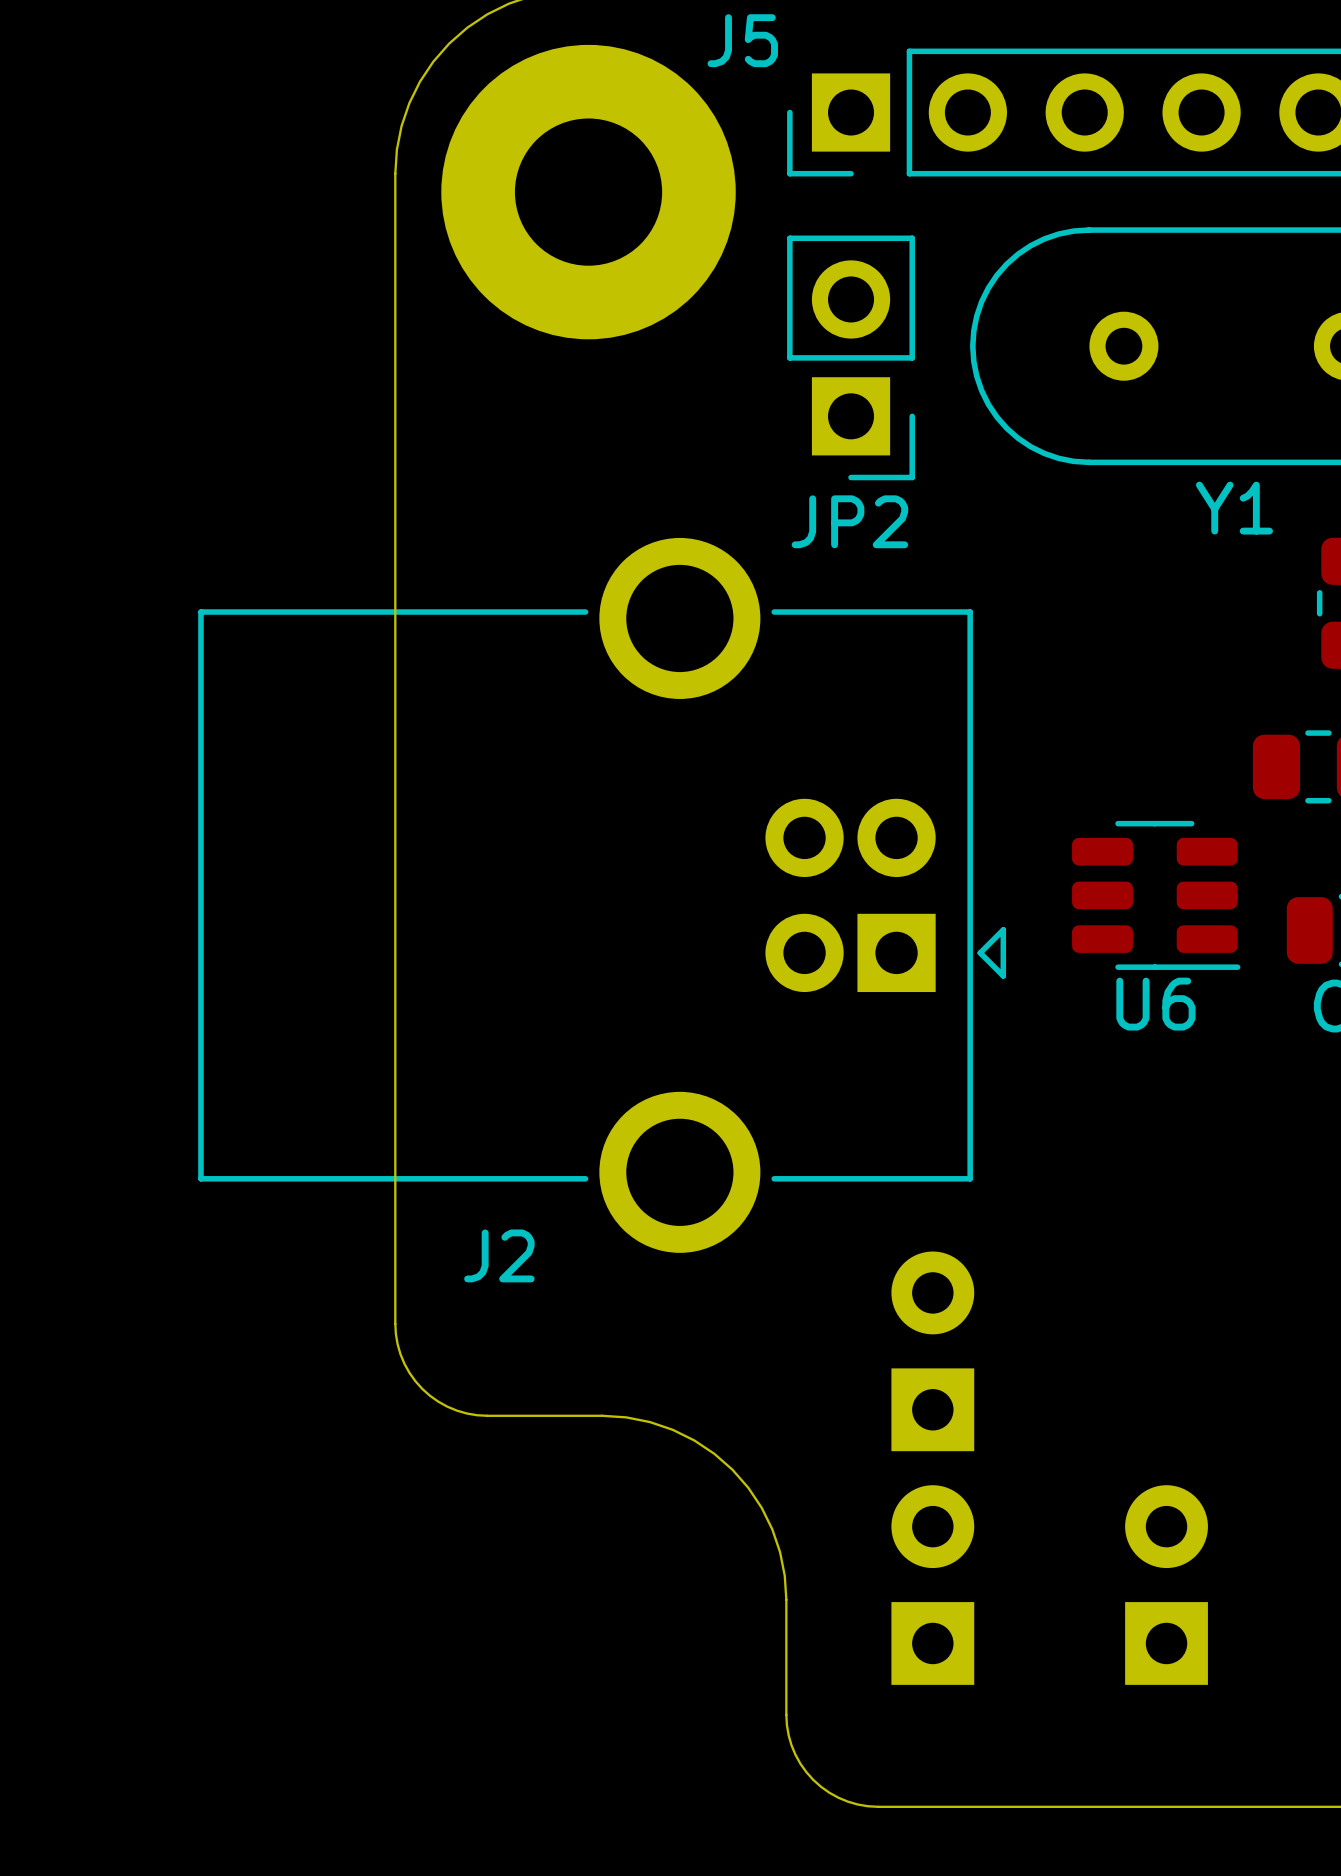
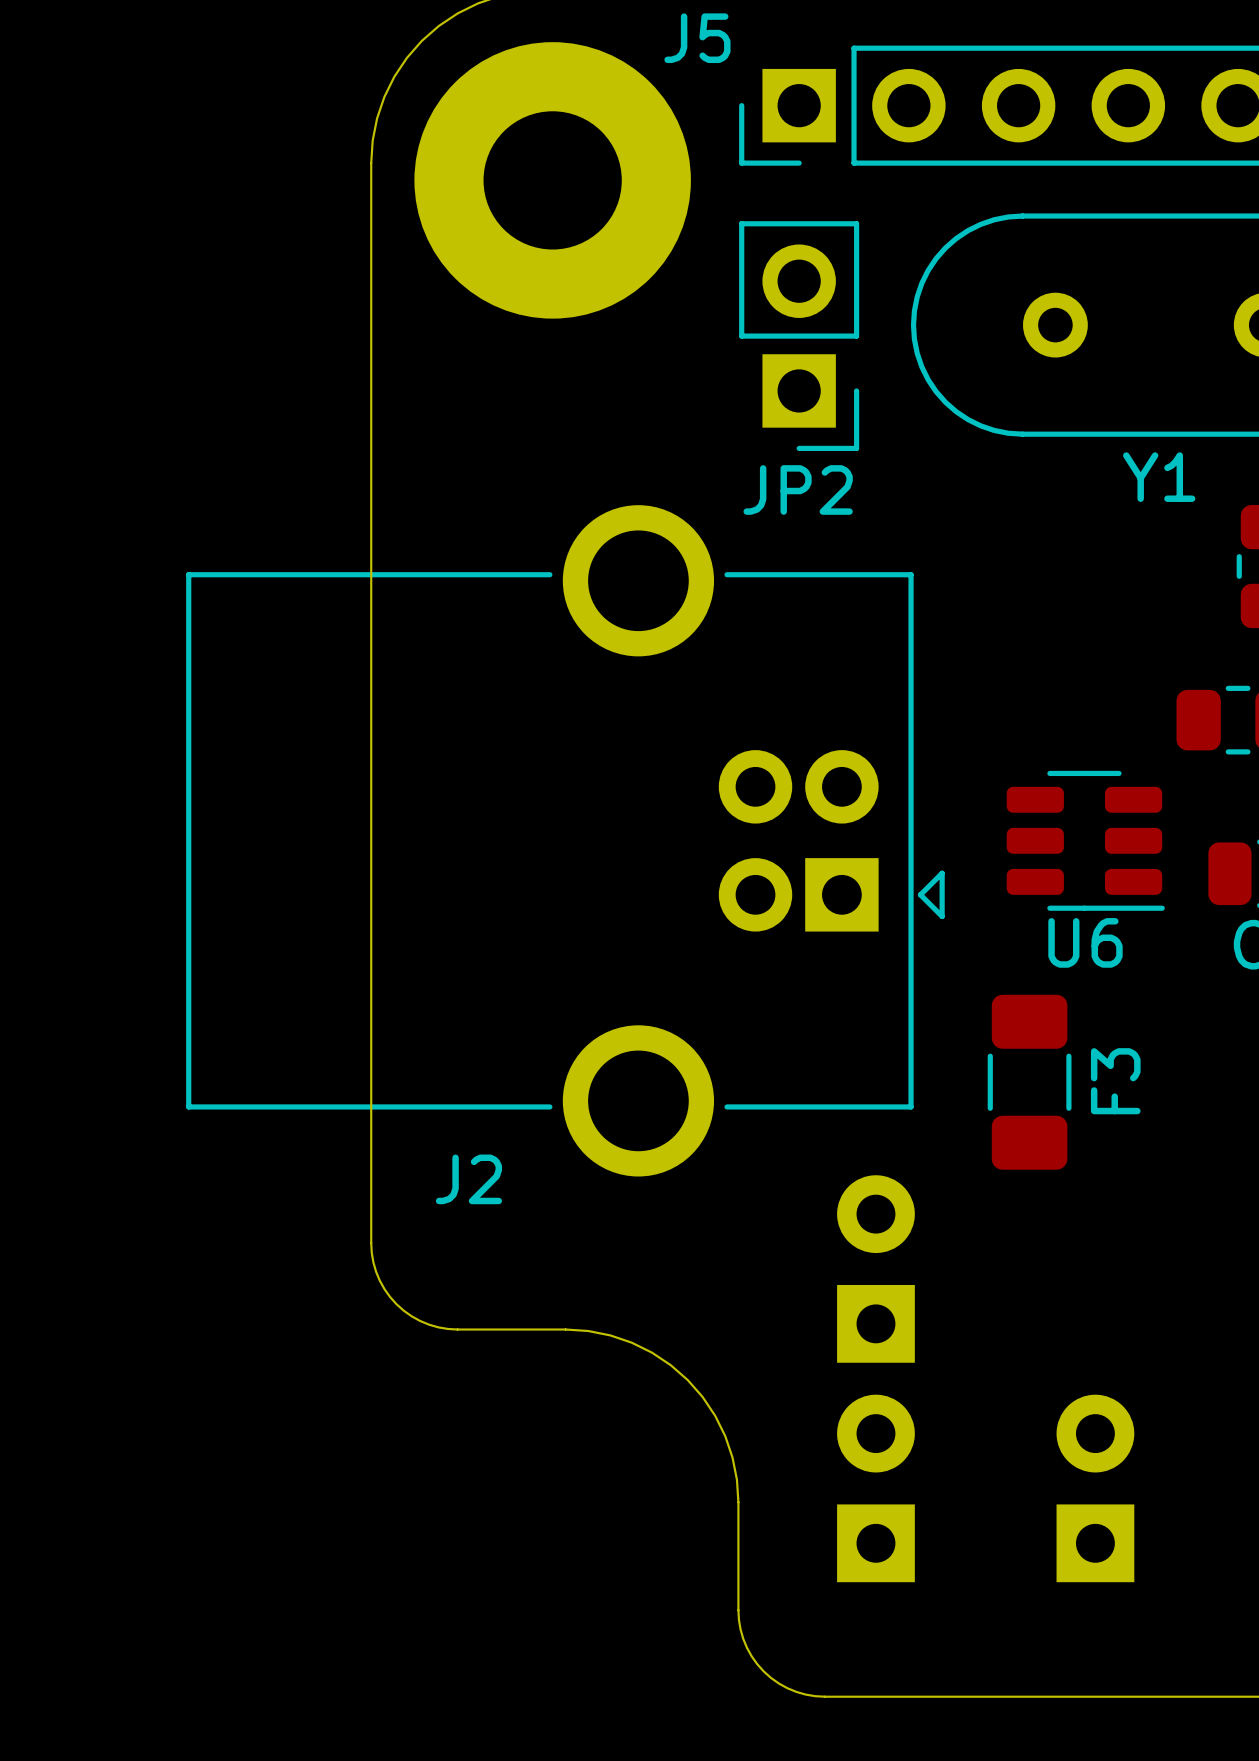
F3: none -> (1029, 1082)

